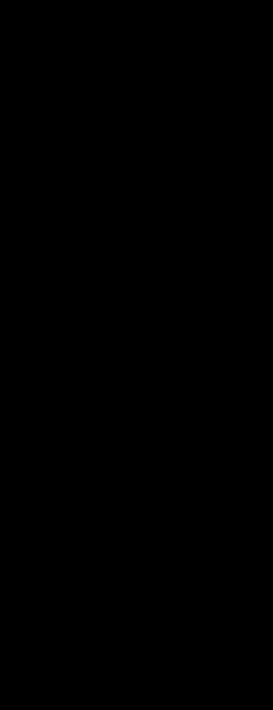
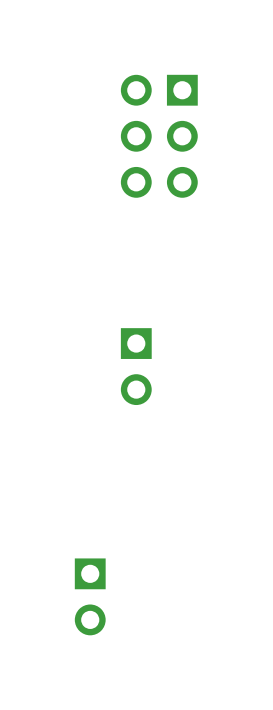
part: none -> (159, 136)
part: none -> (136, 366)
part: none -> (90, 596)

